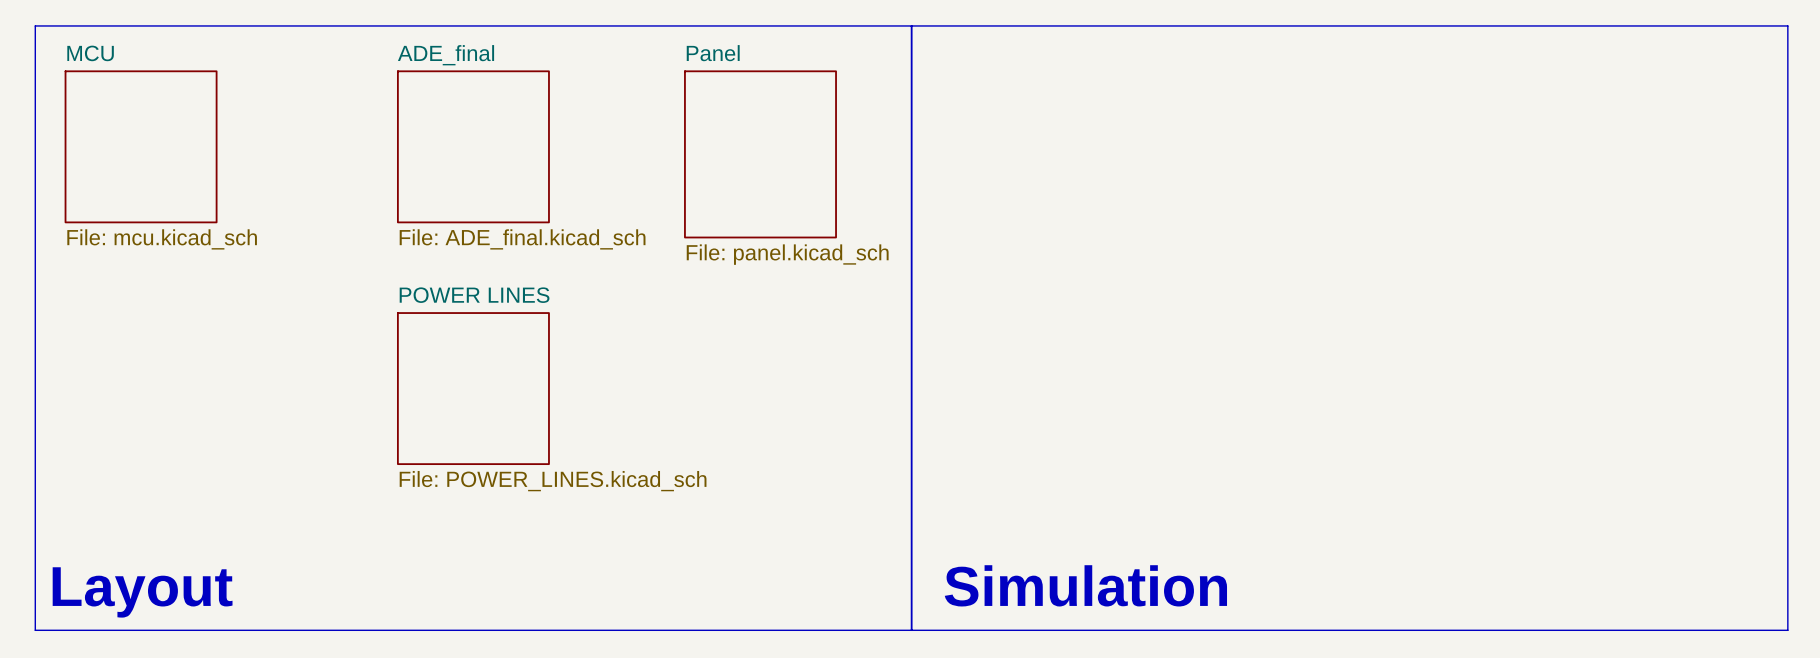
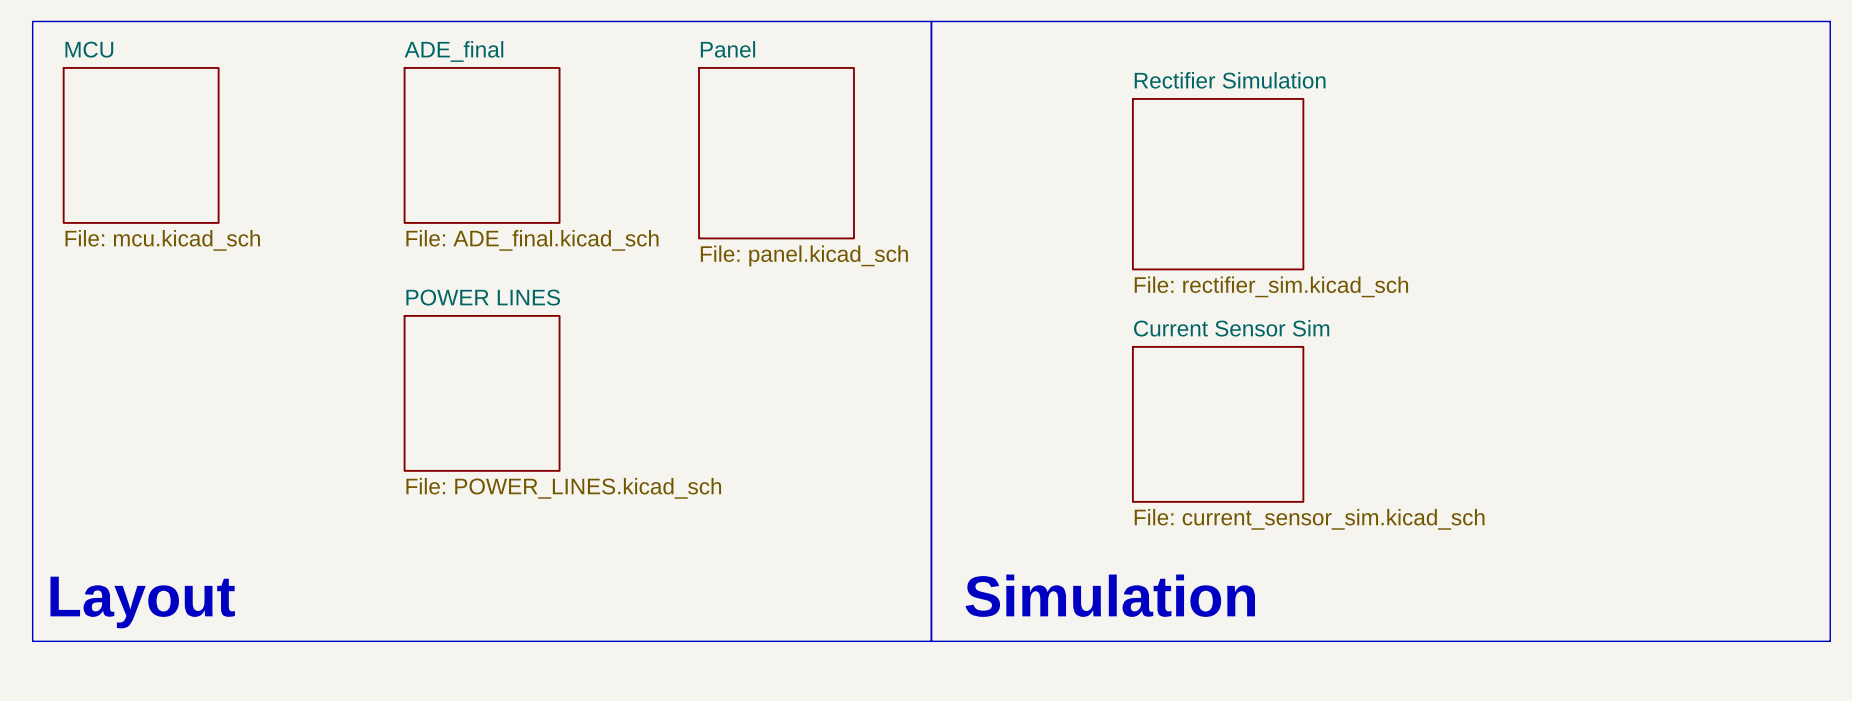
sheet Rectifier Simulation: none -> File: rectifier_sim.kicad_sch (1218, 184)
sheet Current Sensor Sim: none -> File: current_sensor_sim.kicad_sch (1218, 424)

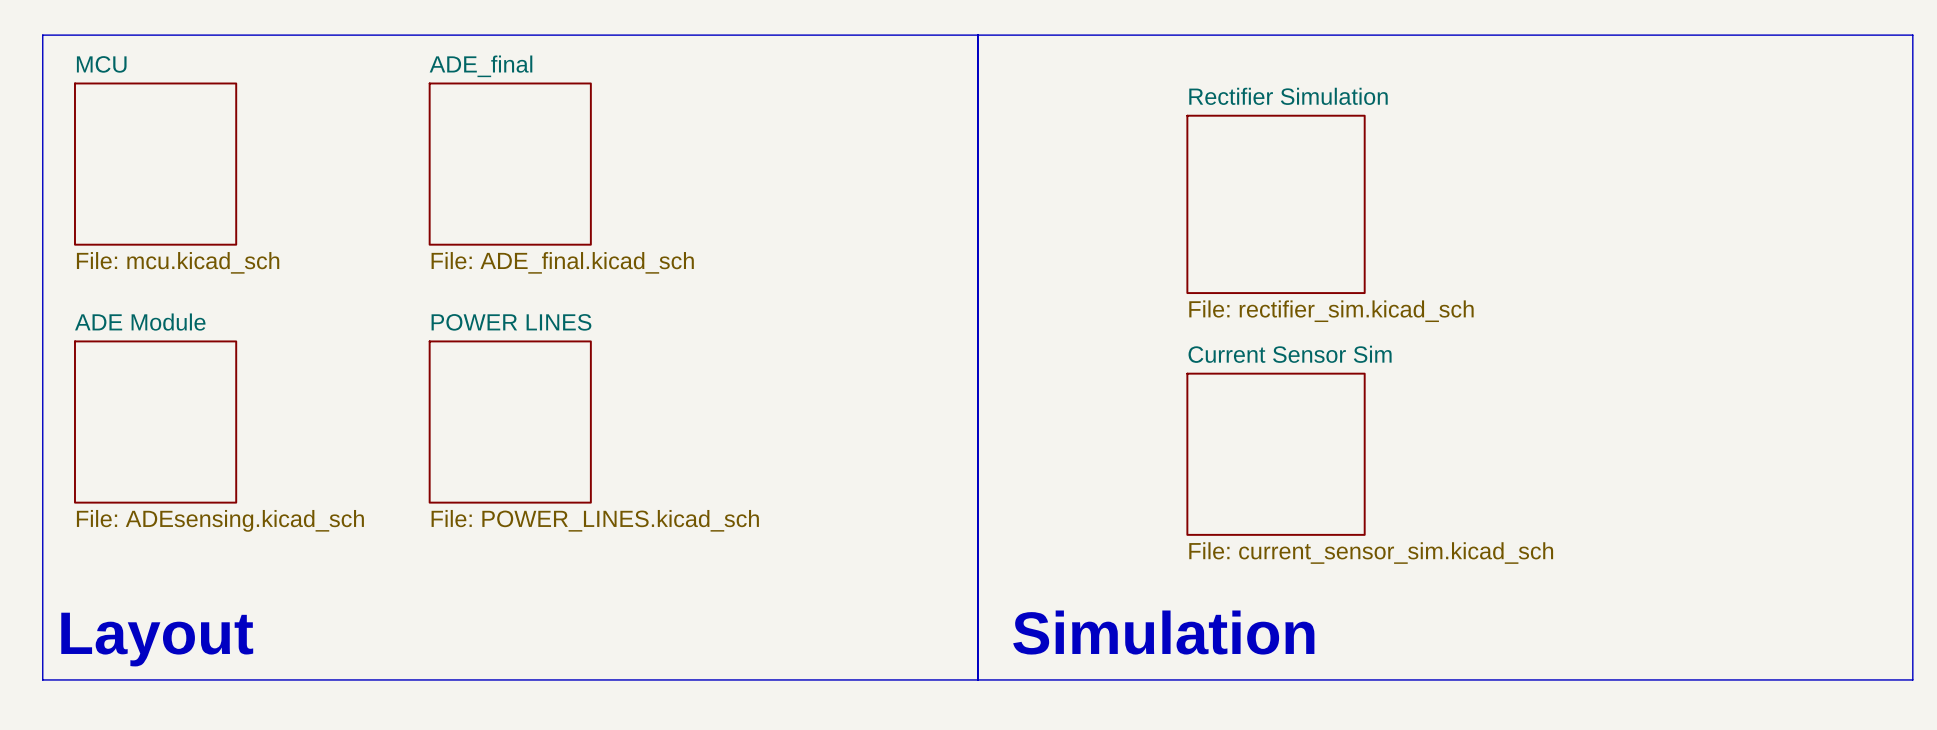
sheet Panel: File: panel.kicad_sch (776, 153) -> none
sheet ADE Module: none -> File: ADEsensing.kicad_sch (155, 422)

